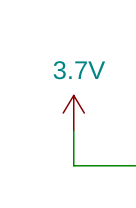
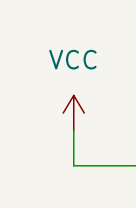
power symbol: 3.7V (73, 113) -> VCC (73, 113)

